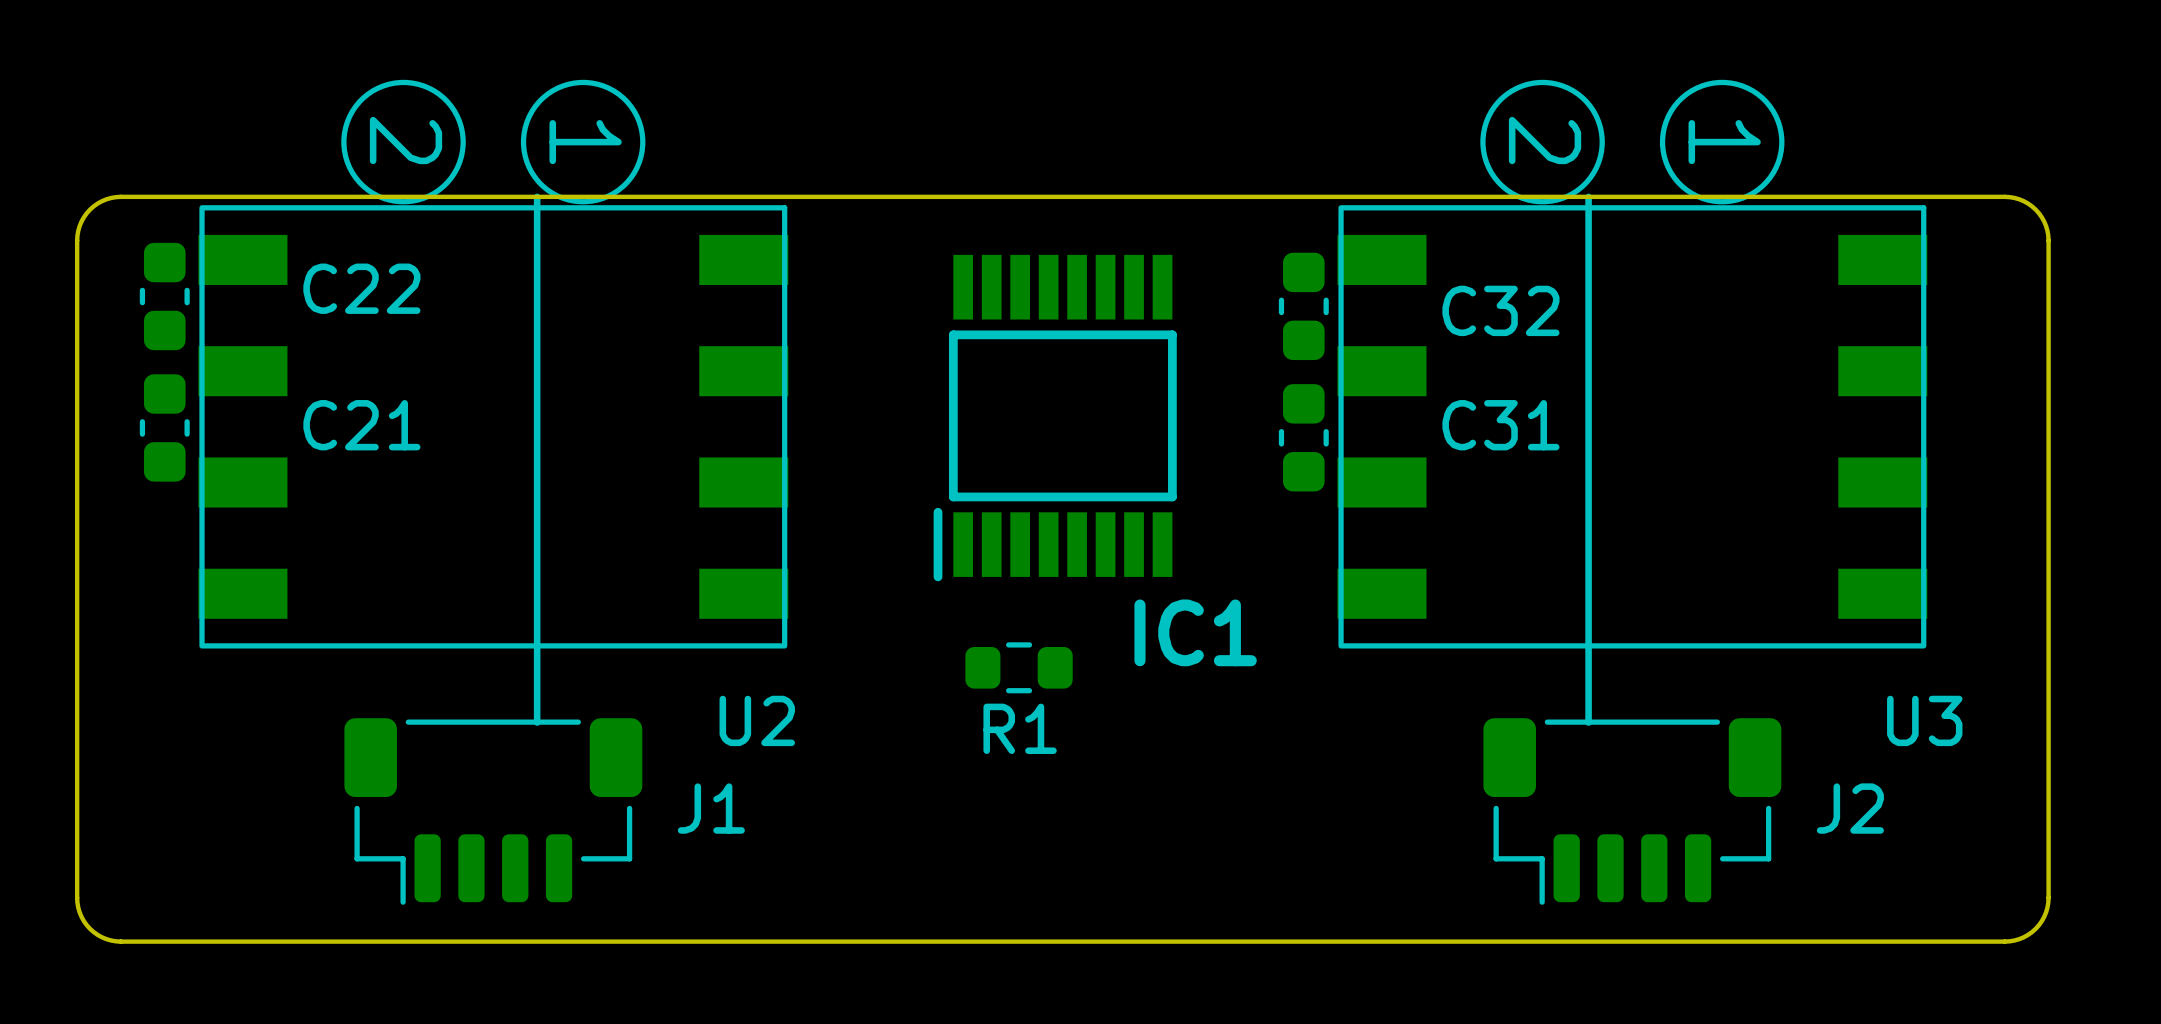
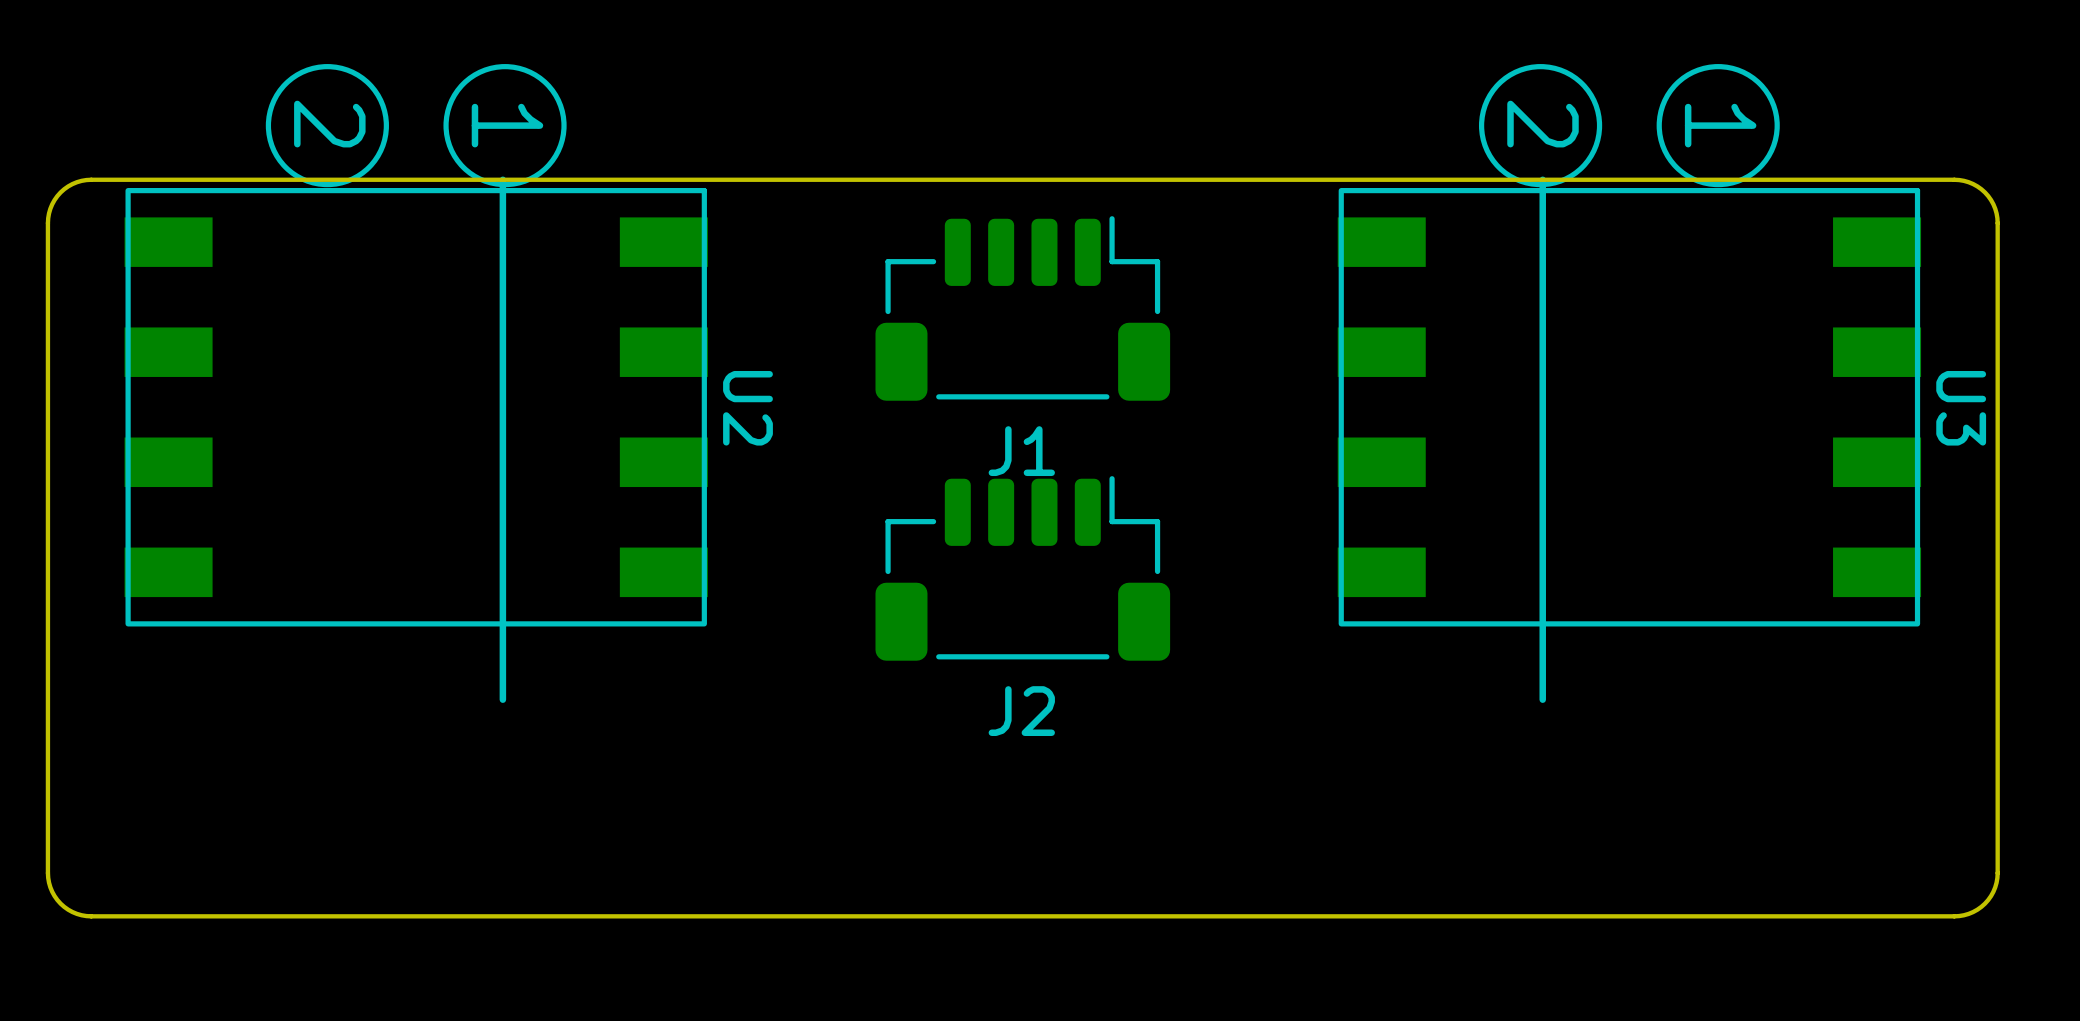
C22: (164, 296) -> none
C32: (1303, 306) -> none
U2 position: (493, 364) -> (416, 345)
U3 position: (1632, 364) -> (1629, 345)
IC1: (1055, 418) -> none
C21: (164, 427) -> none
C31: (1303, 437) -> none
R1: (1019, 667) -> none
U2 name rotation: 0° (757, 720) -> 90° clockwise (747, 408)
U2 name position: U2 (757, 720) -> U2 (747, 408)
U3 name rotation: 0° (1924, 720) -> 90° clockwise (1961, 408)
U3 name position: U3 (1924, 720) -> U3 (1961, 408)
J1 name position: J1 (711, 808) -> J1 (1021, 451)
J2 name position: J2 (1850, 808) -> J2 (1021, 711)
J1 rotation: 0° (493, 811) -> 180° (1022, 308)
J1 position: (493, 811) -> (1022, 308)
J2 rotation: 0° (1632, 811) -> 180° (1022, 568)
J2 position: (1632, 811) -> (1022, 568)

